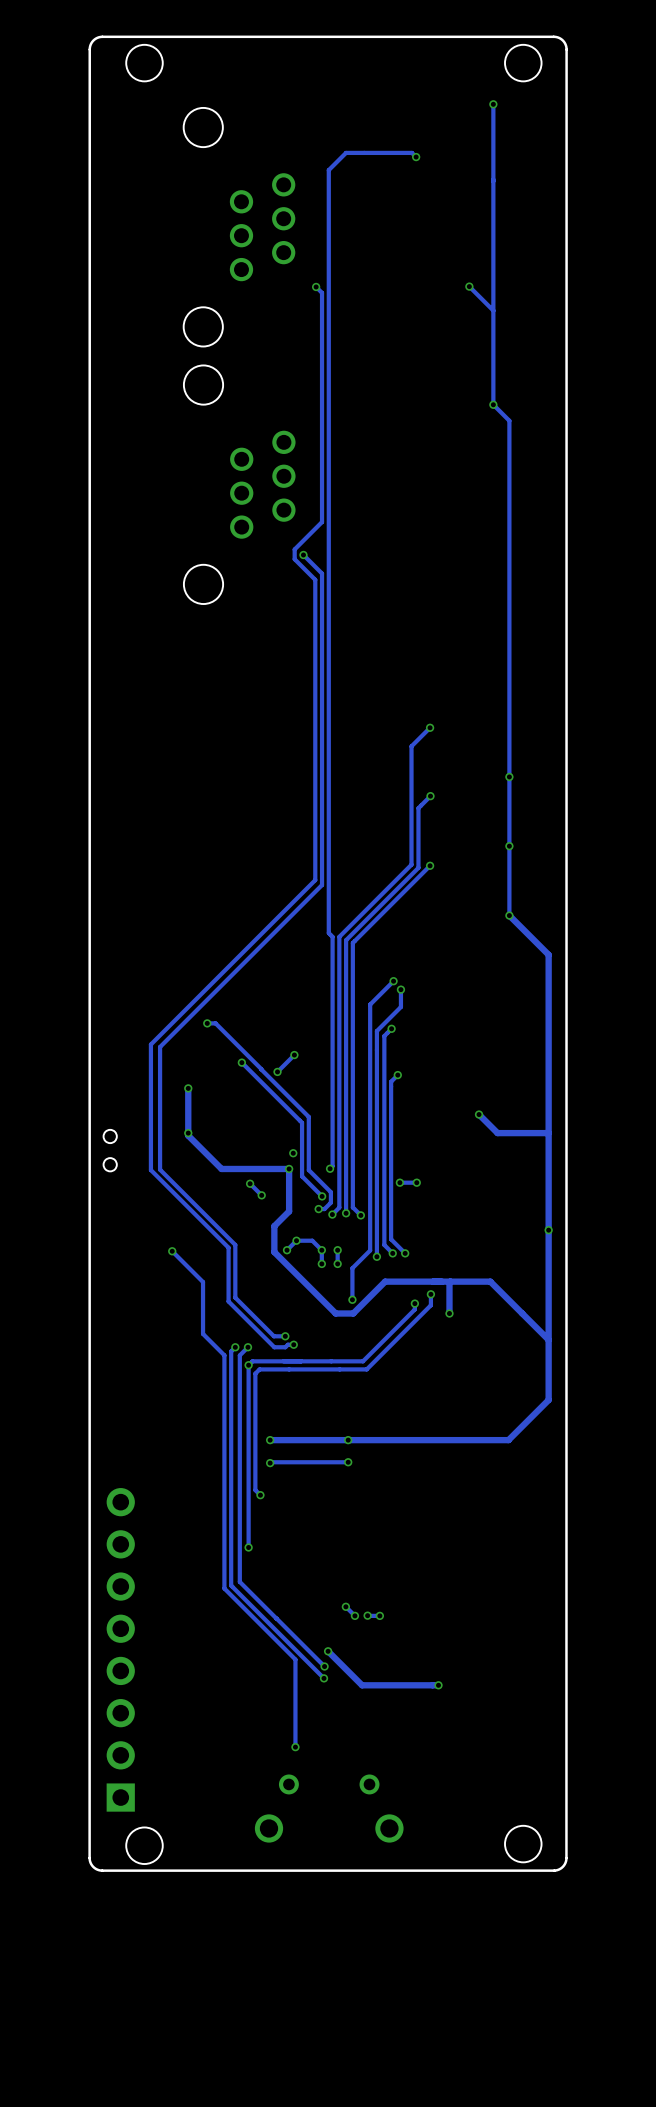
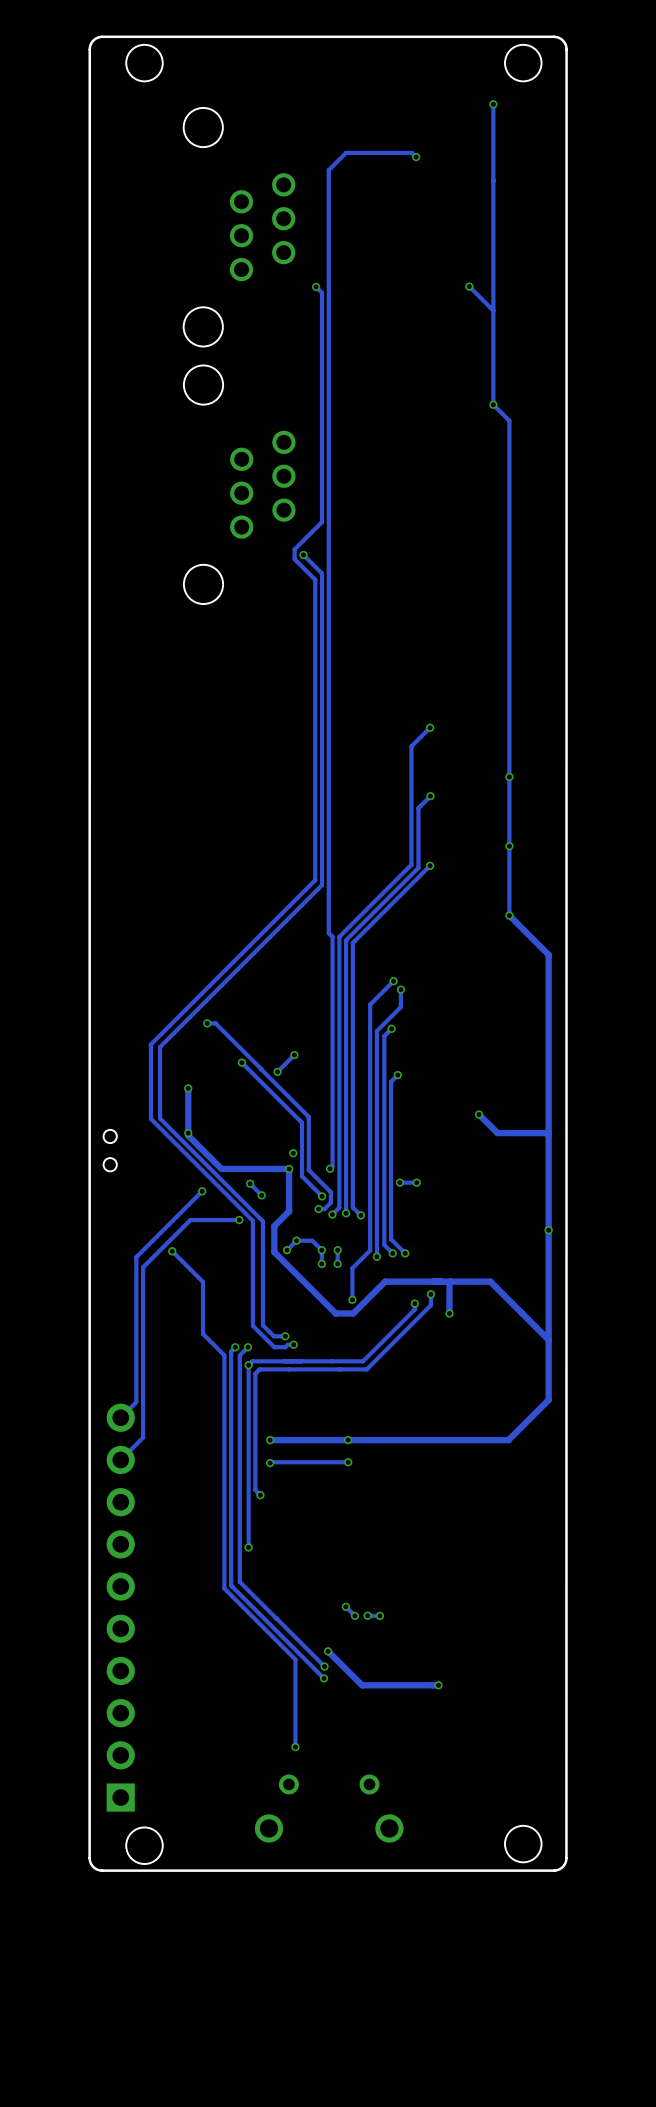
track: (150, 1118) (150, 1170) (228, 1247) (228, 1301) (252, 1325) -> (150, 1118) (252, 1220) (252, 1325)
track: (160, 1118) (160, 1169) (235, 1244) (235, 1297) (262, 1325) -> (160, 1118) (262, 1221) (262, 1325)
track: none -> (202, 1191) (136, 1257) (136, 1402) (120, 1417)
via: none -> (202, 1191)
track: none -> (239, 1220) (190, 1220) (143, 1267) (143, 1437) (120, 1459)
via: none -> (239, 1220)
part: none -> (120, 1607)

